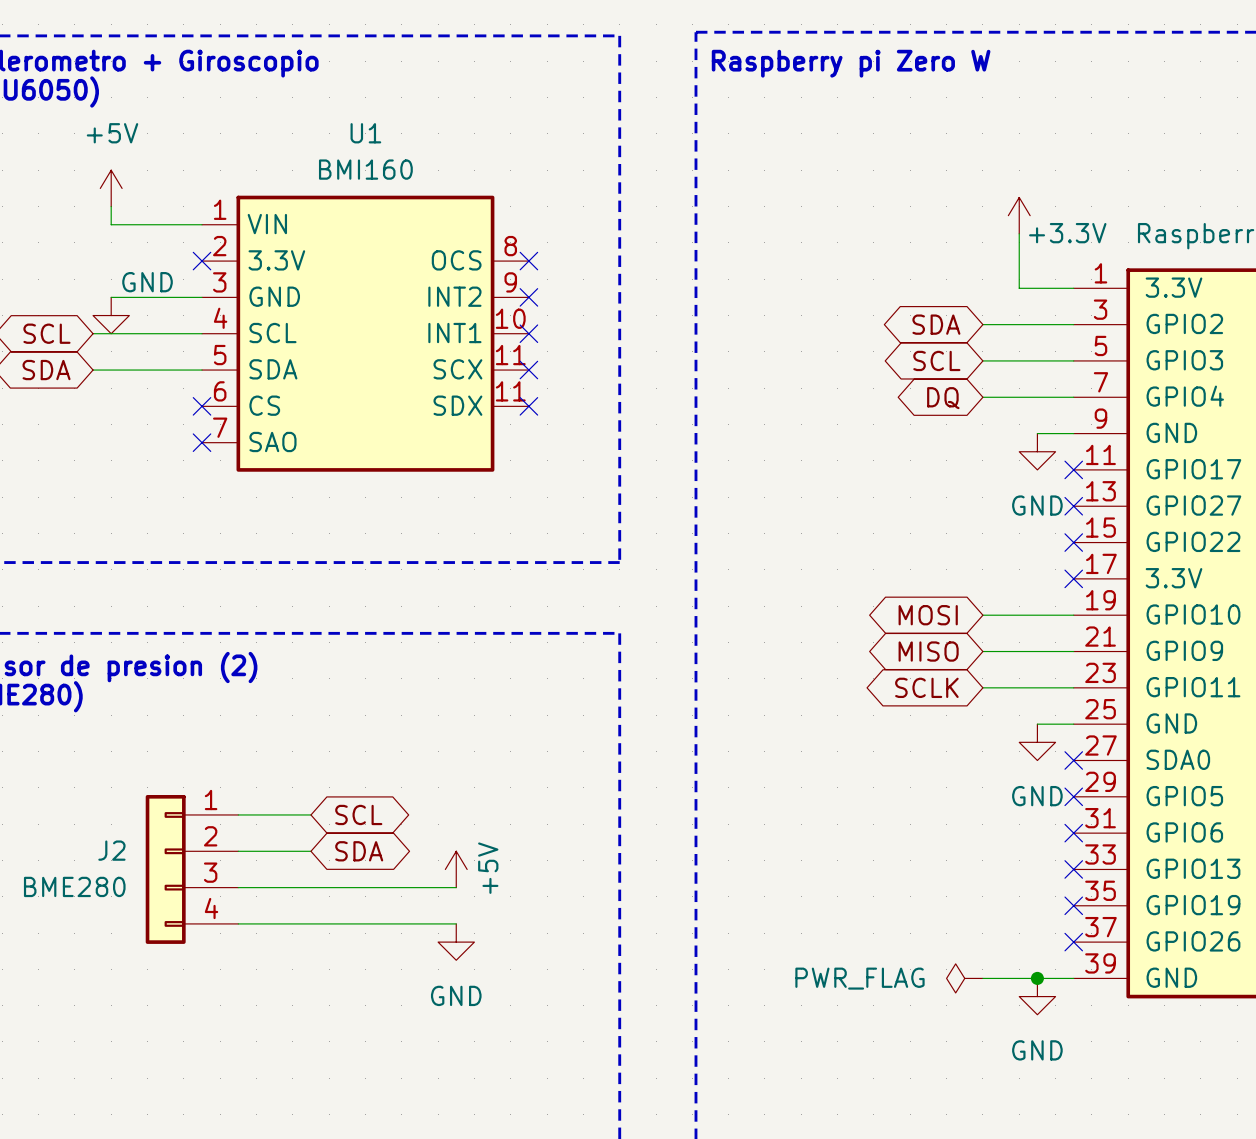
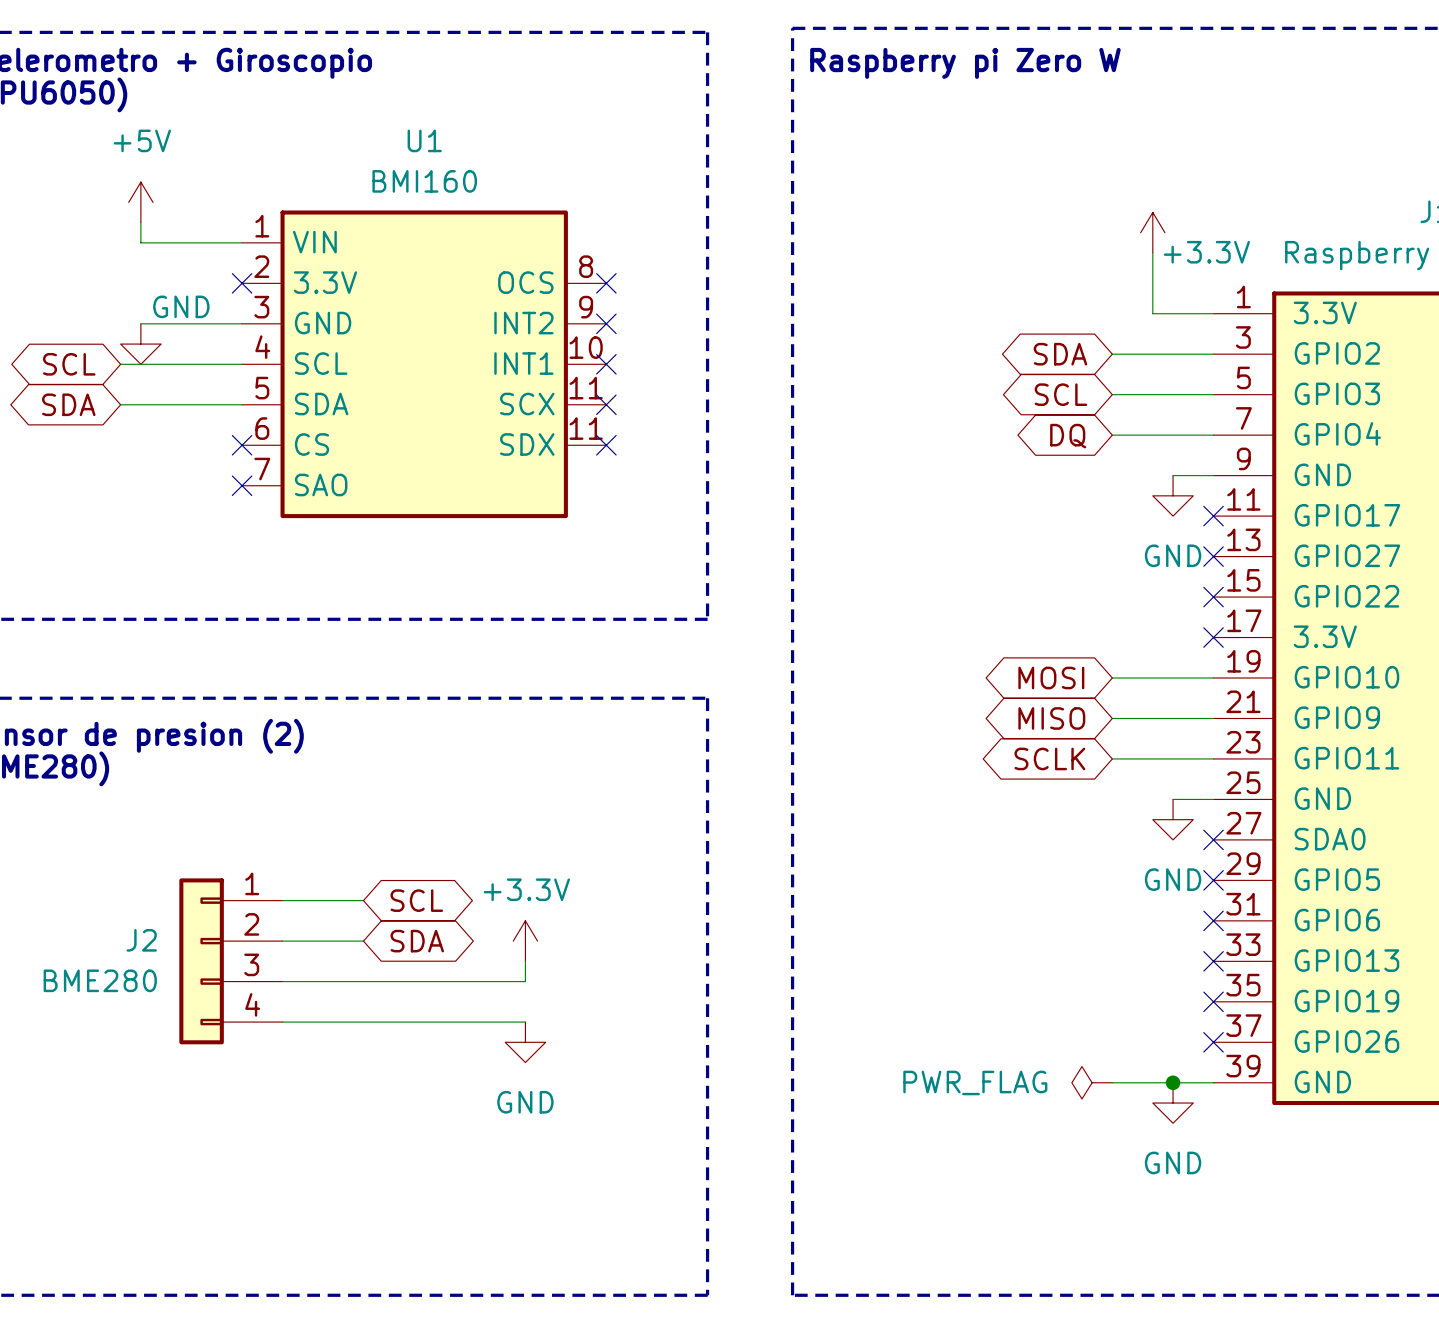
power symbol: none -> +3.3V (525, 941)
power symbol: +5V (456, 869) -> none

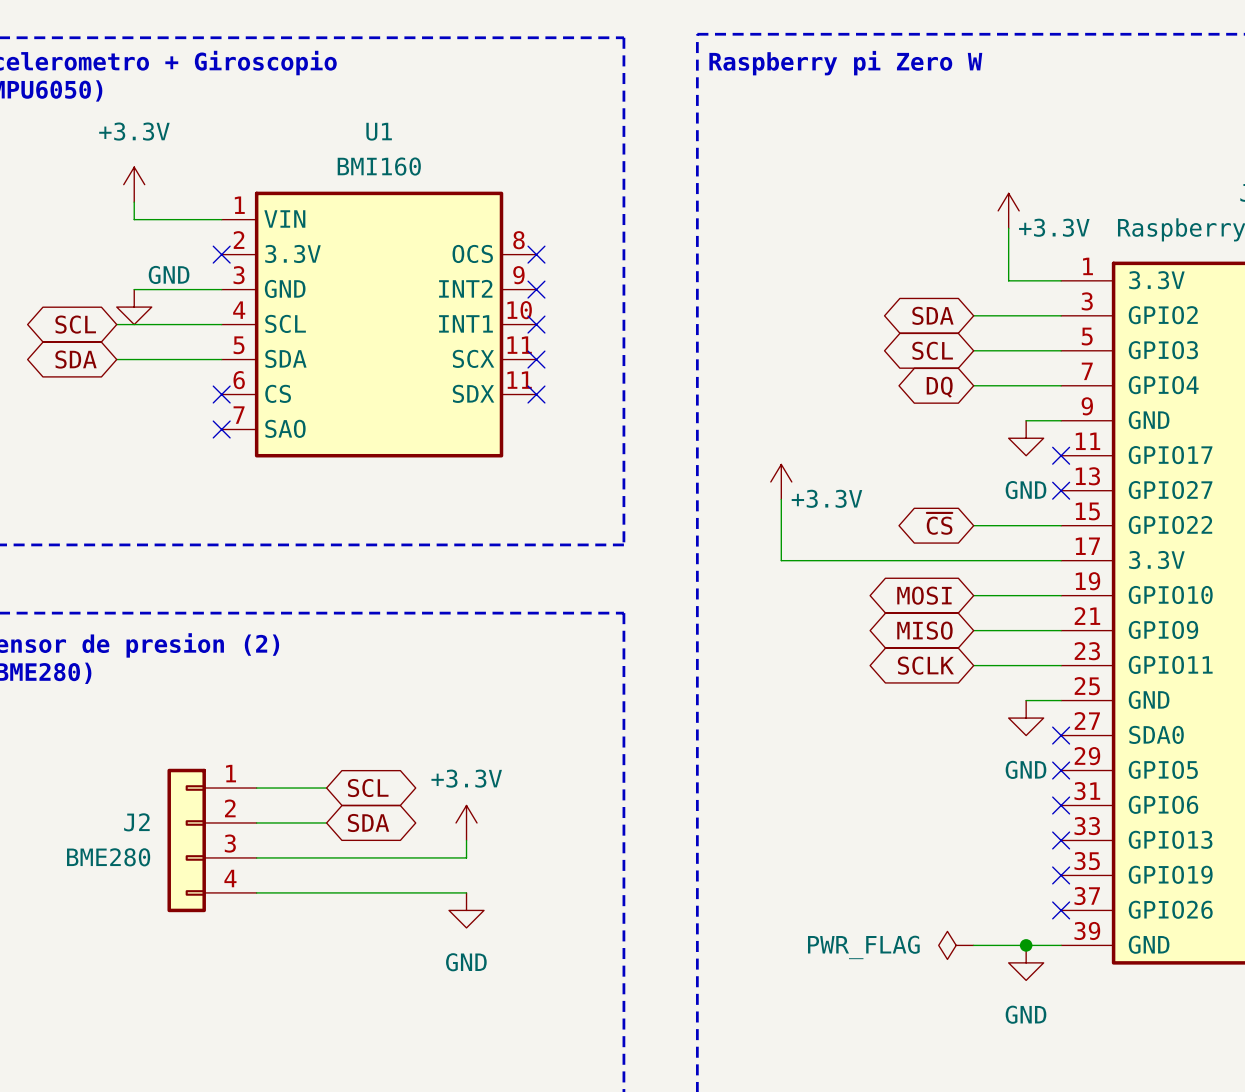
power symbol: +5V (140, 202) -> +3.3V (134, 184)
power symbol: none -> +3.3V (781, 481)
wire: none -> (781, 499) (781, 560) (1061, 560)
global label: none -> ~{CS} (939, 523)
wire: none -> (973, 525) (1061, 525)
no-connect mark: (1213, 597) -> none
no-connect mark: (1213, 637) -> none

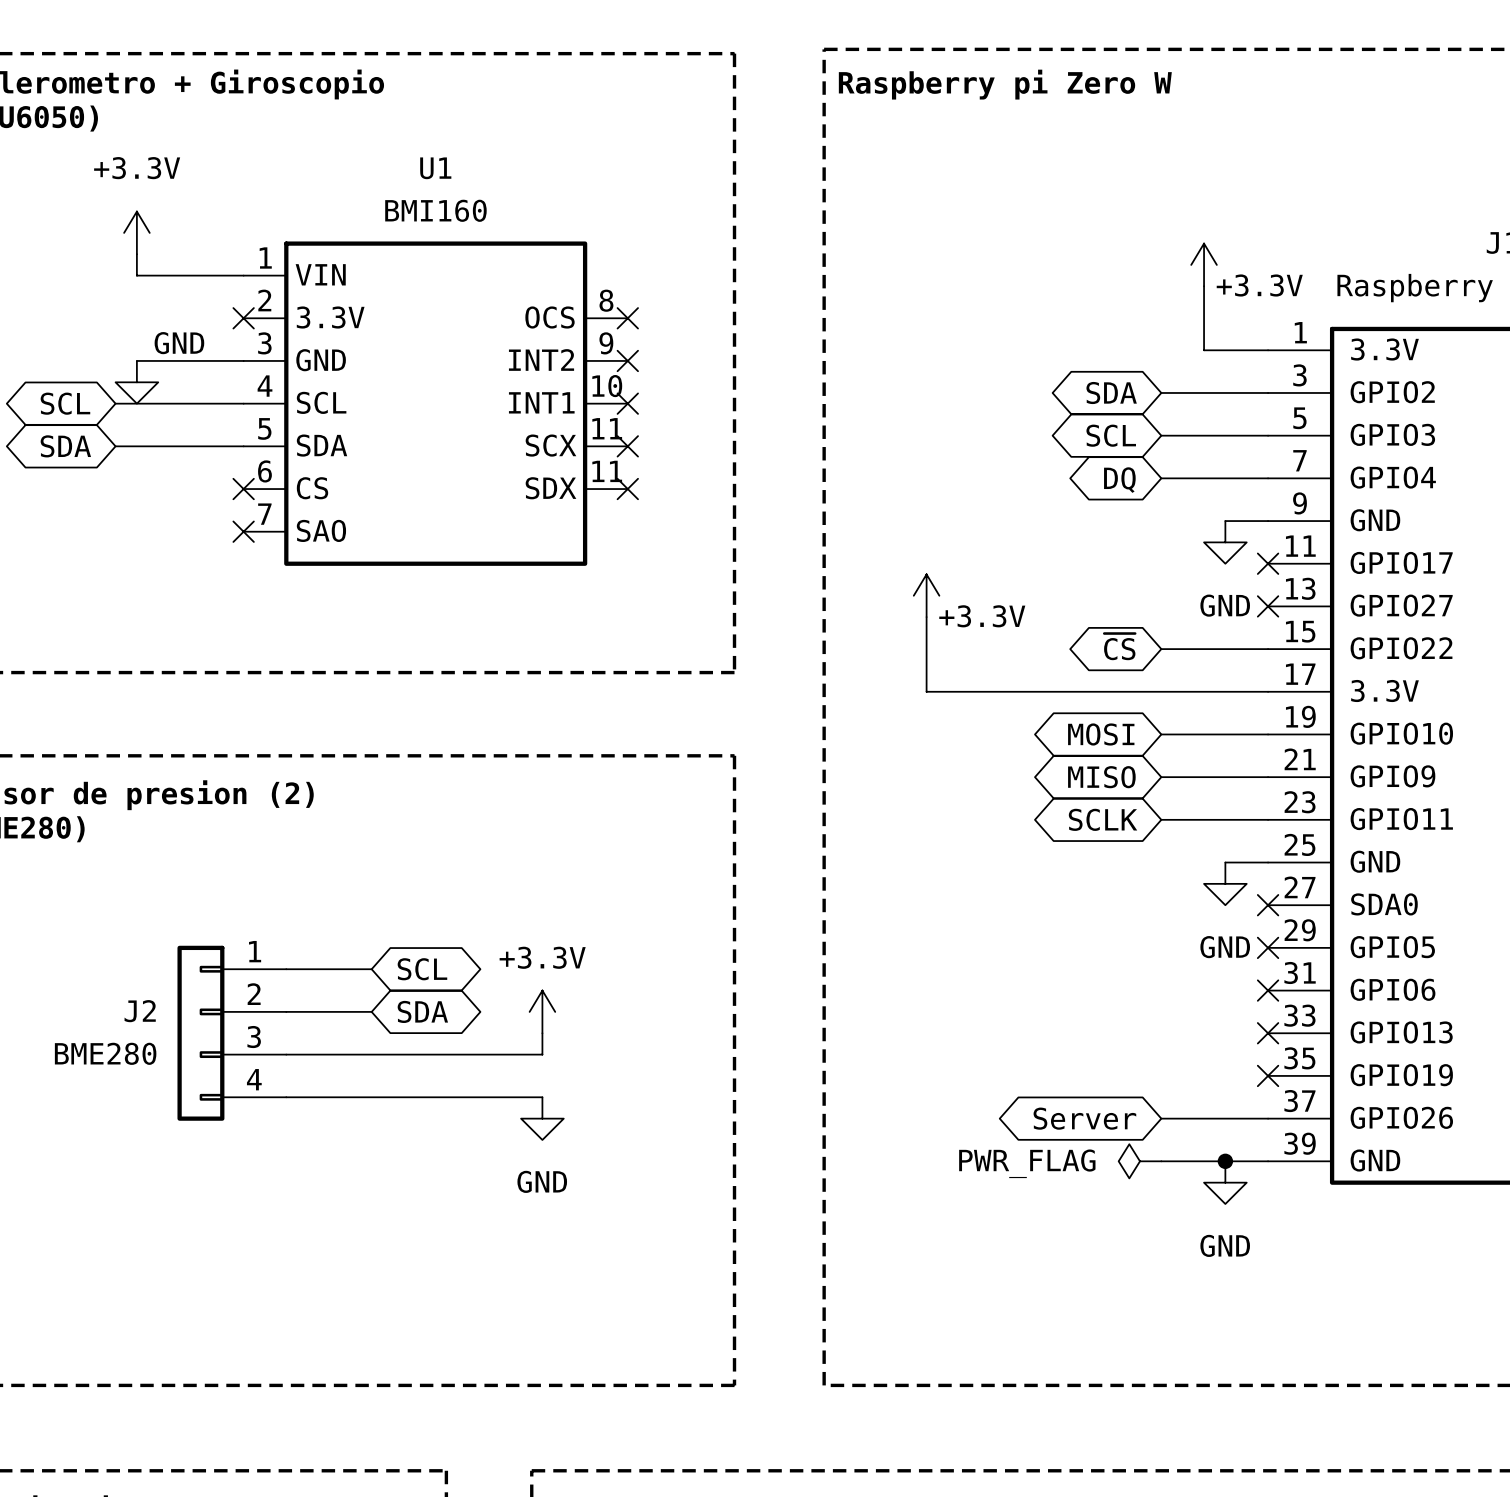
global label: none -> Server (1084, 1118)
wire: none -> (1161, 1118) (1268, 1118)
no-connect mark: (1061, 910) -> none

